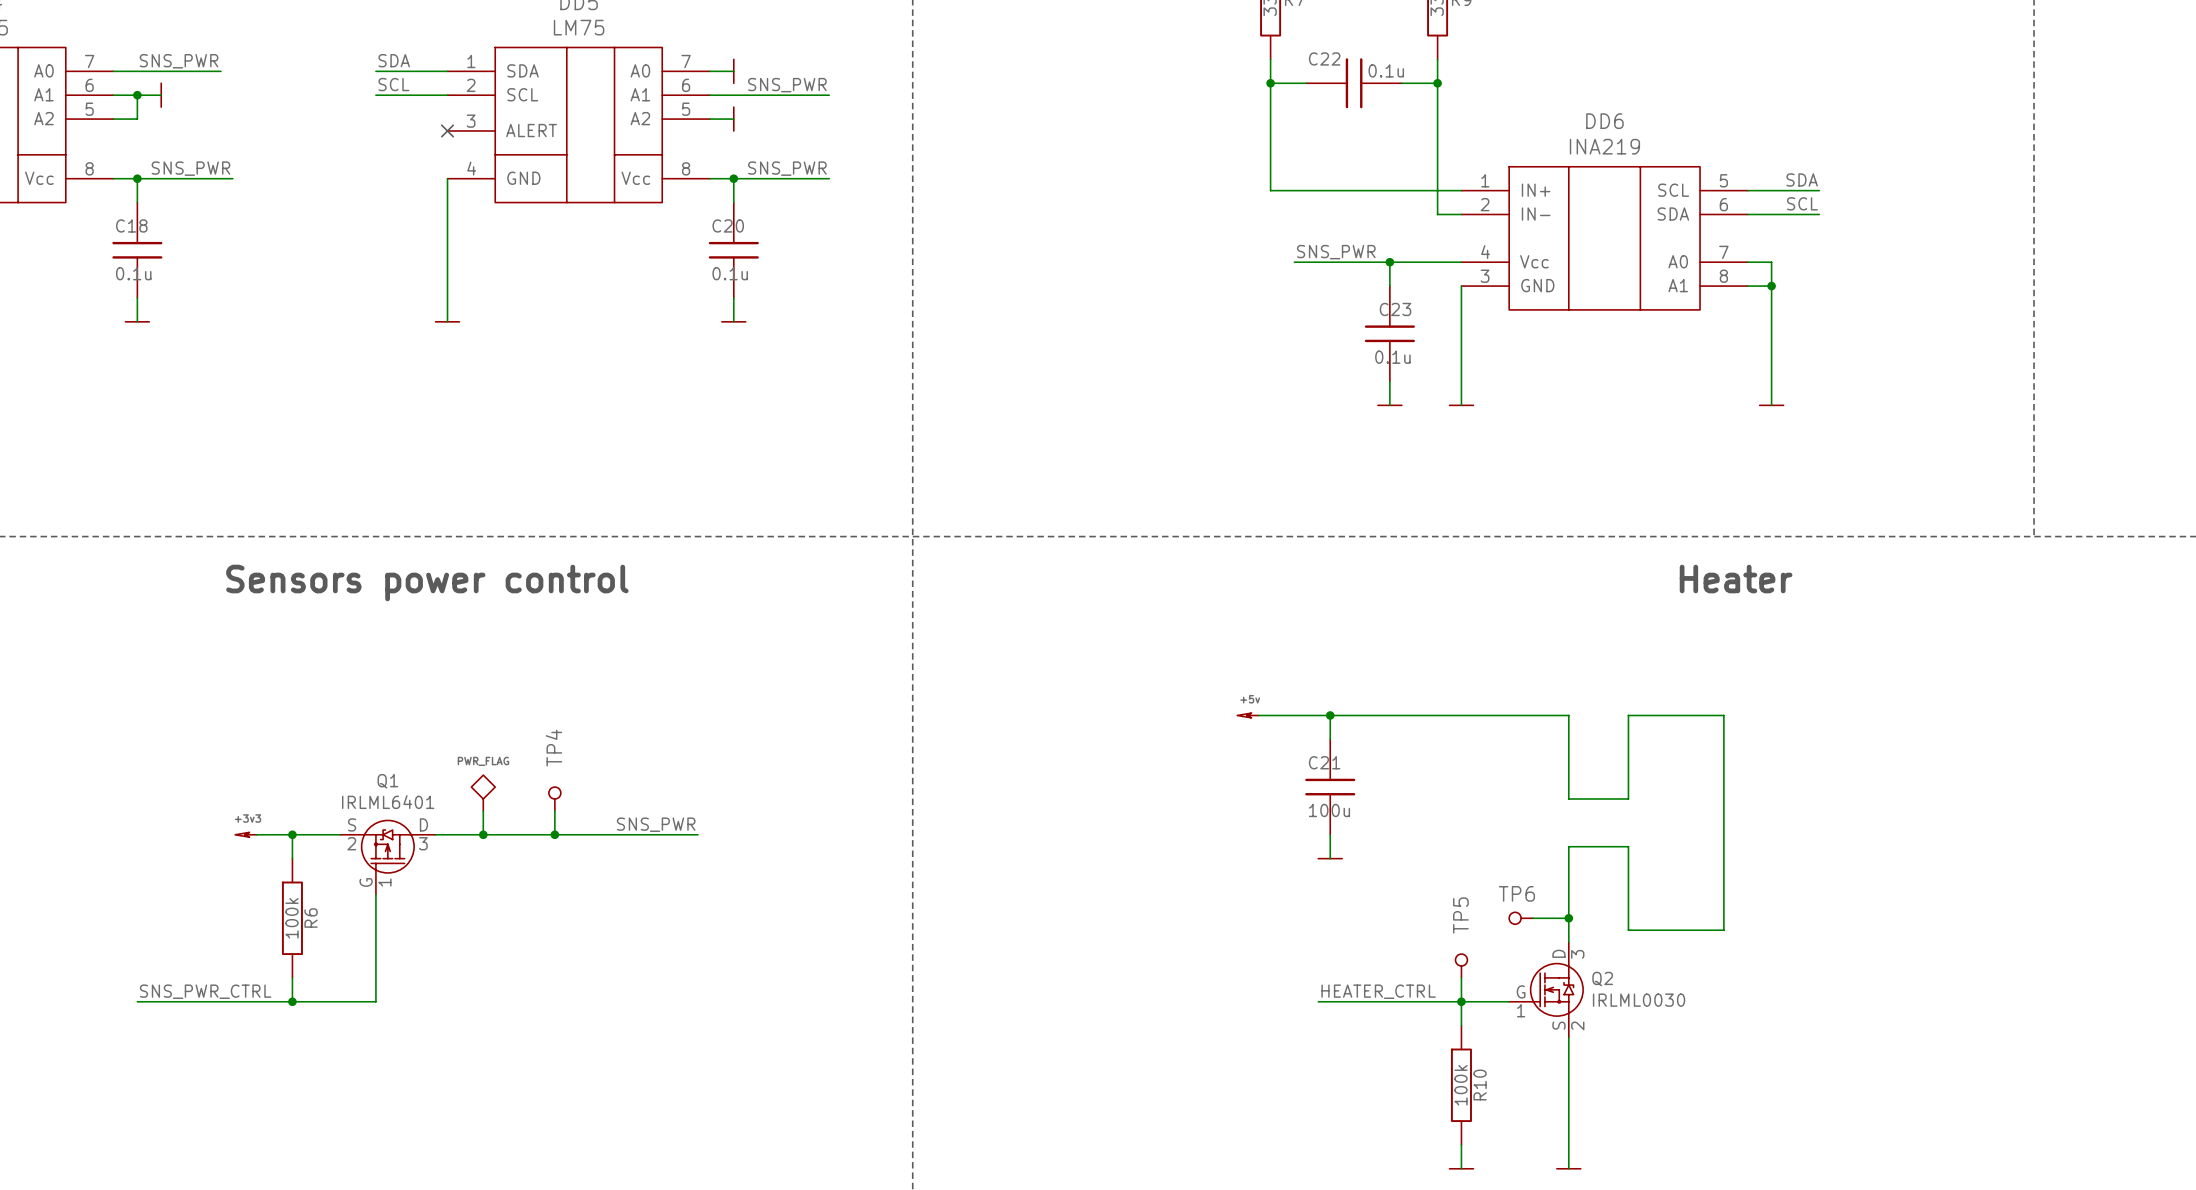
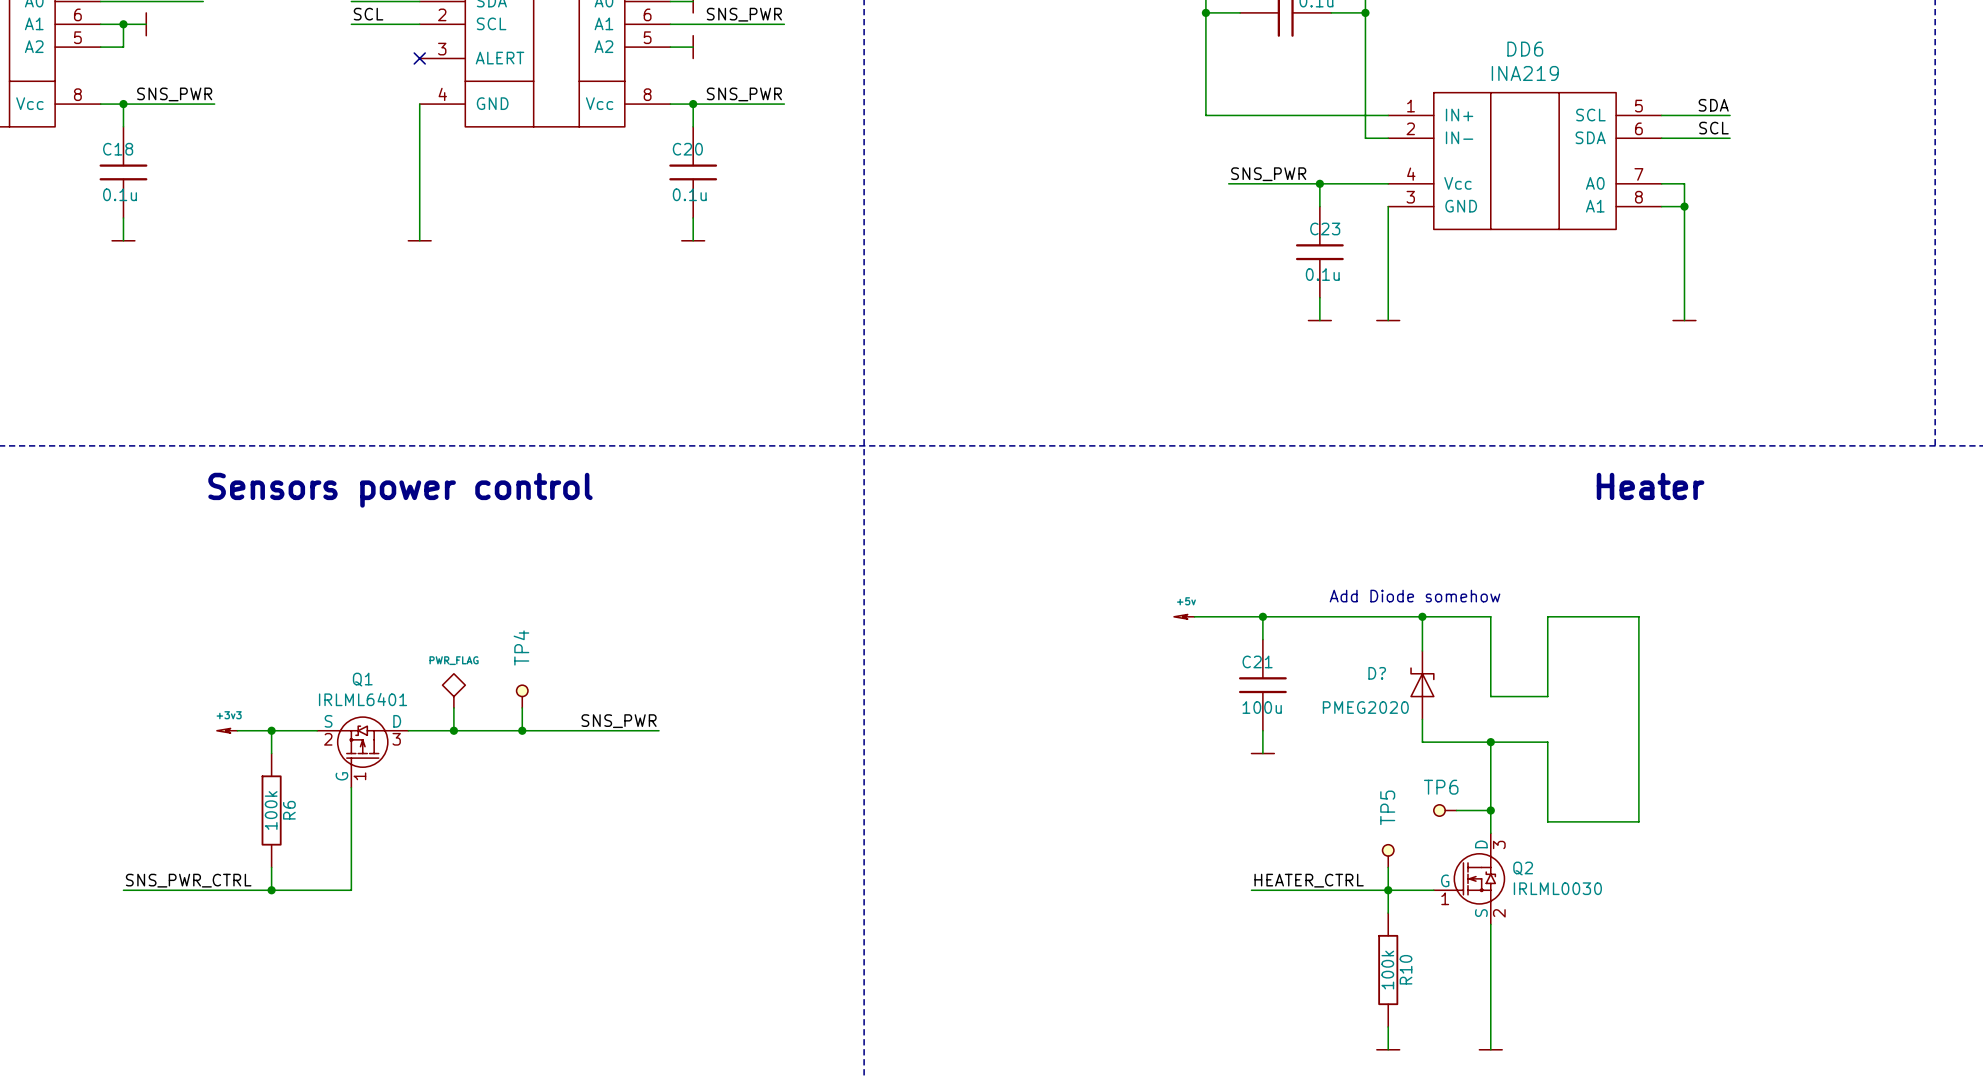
text: none -> Add Diode somehow (1415, 596)
wire: none -> (1422, 616) (1422, 650)
junction: none -> (1422, 616)
D?: none -> PMEG2020 (1422, 685)
wire: none -> (1422, 719) (1422, 742) (1490, 742)
junction: none -> (1490, 742)

